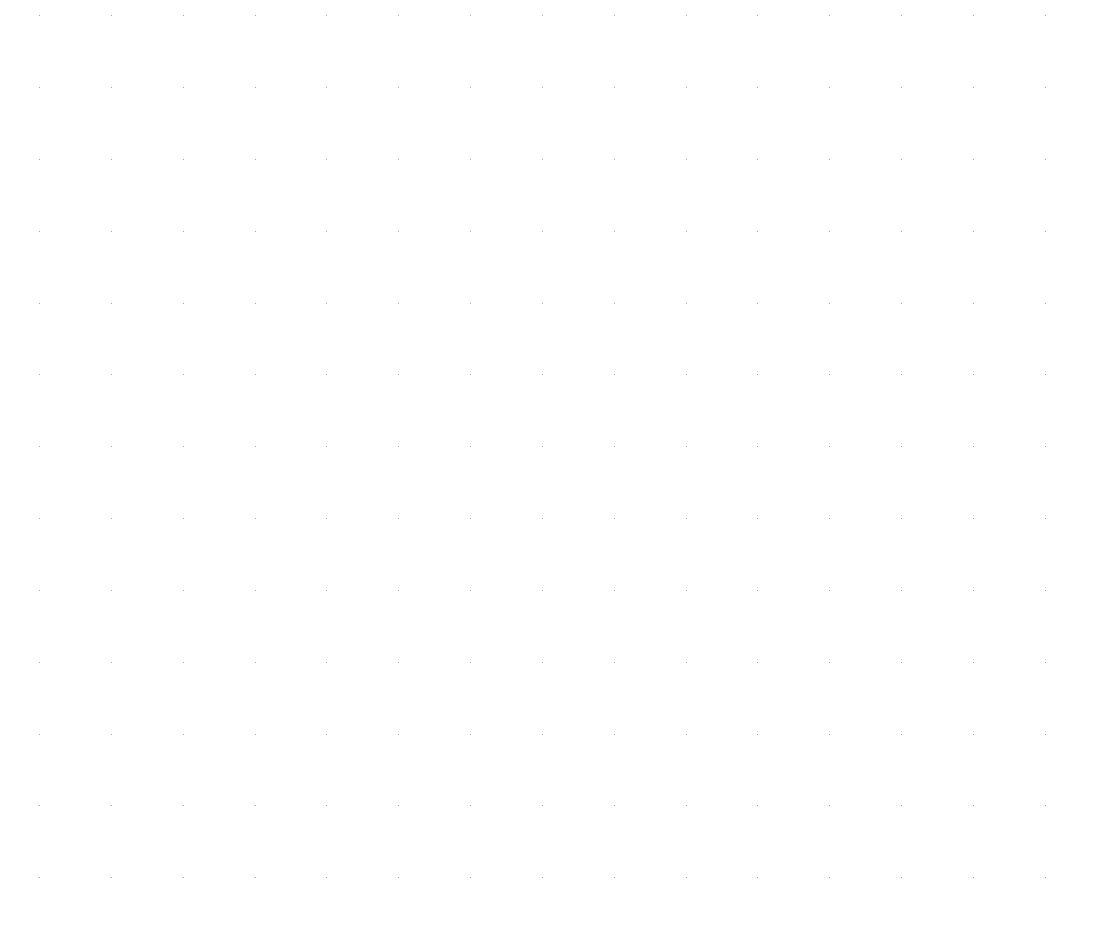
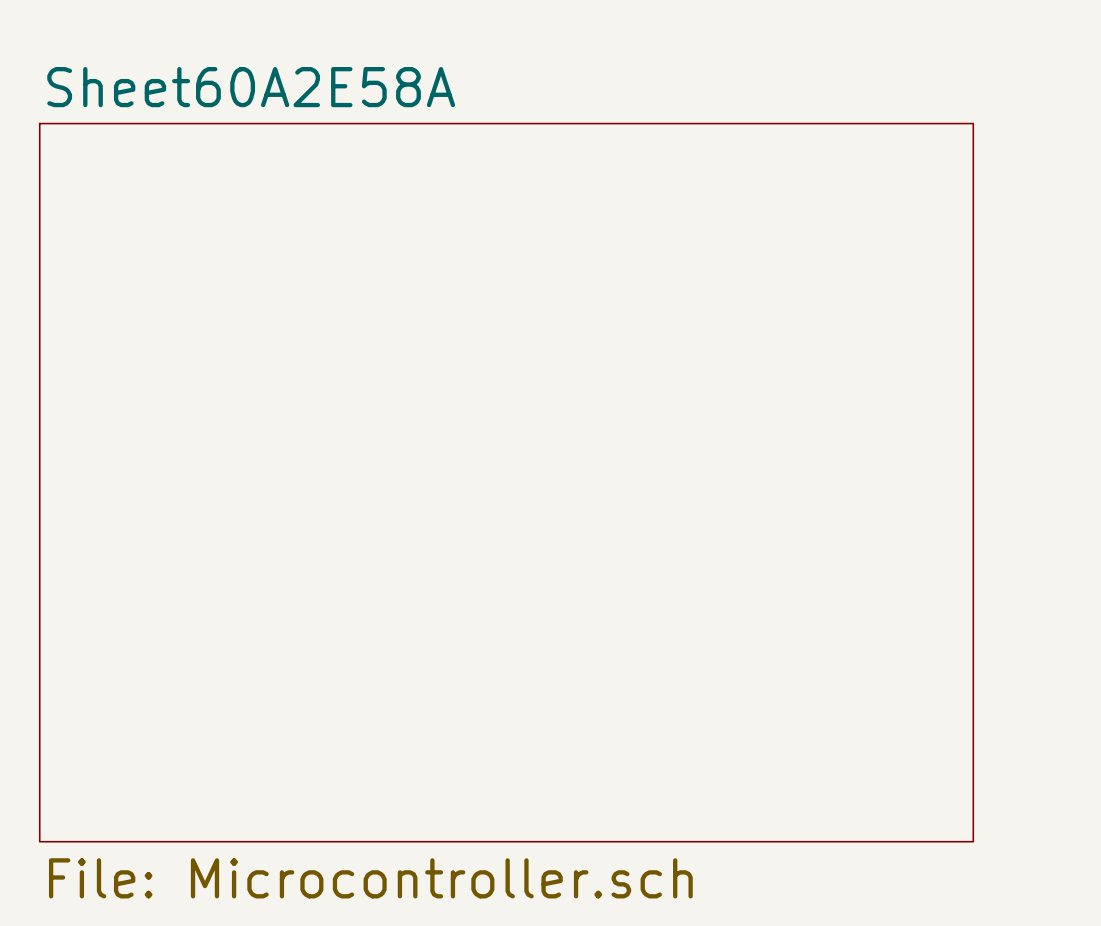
sheet Sheet60A2E58A: none -> File: Microcontroller.sch (506, 482)

